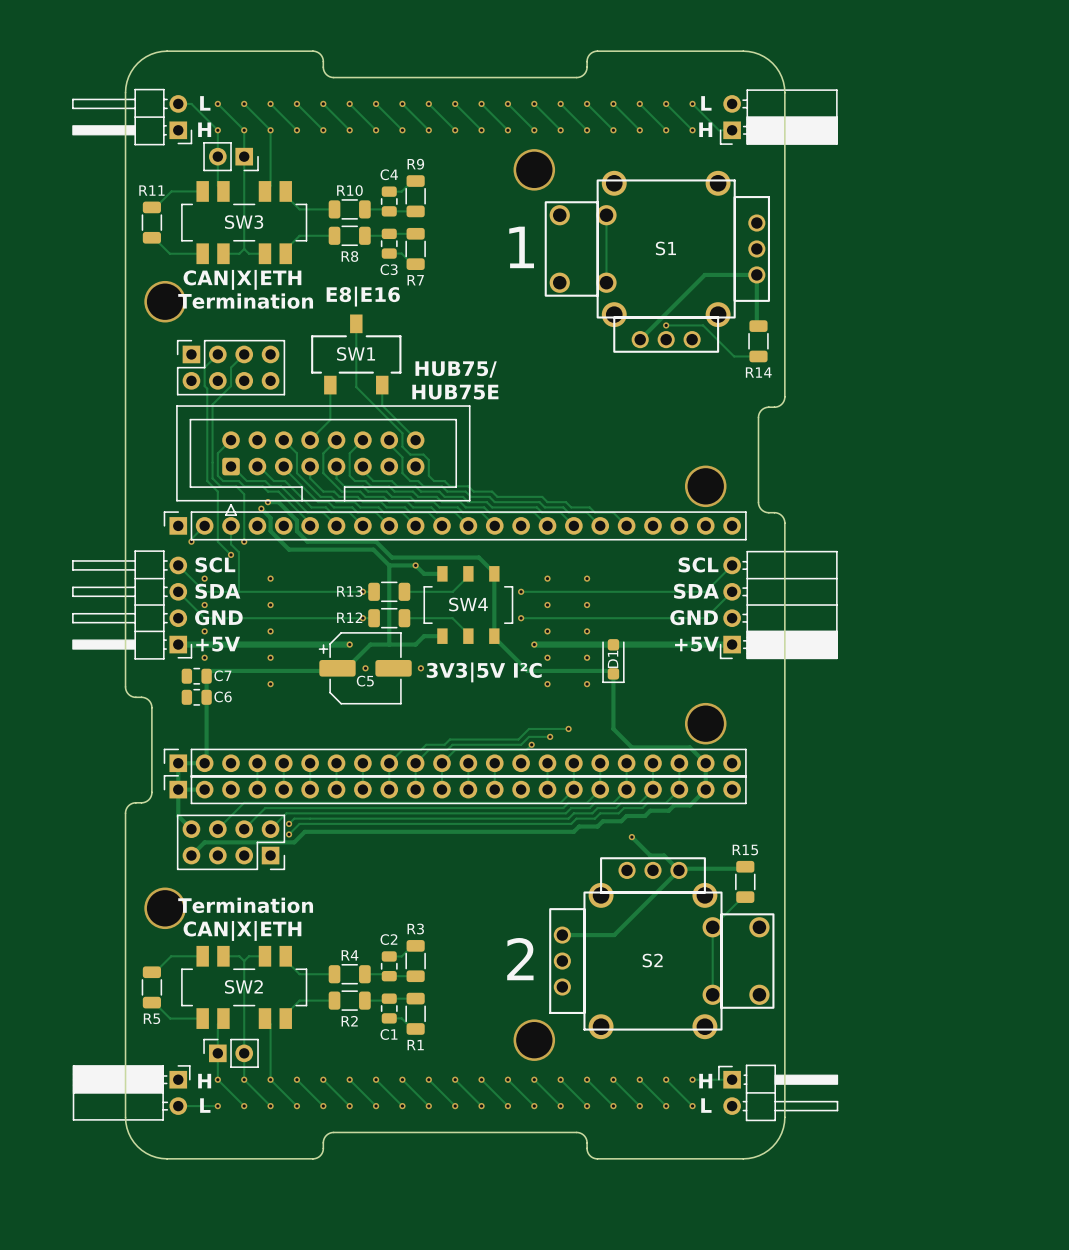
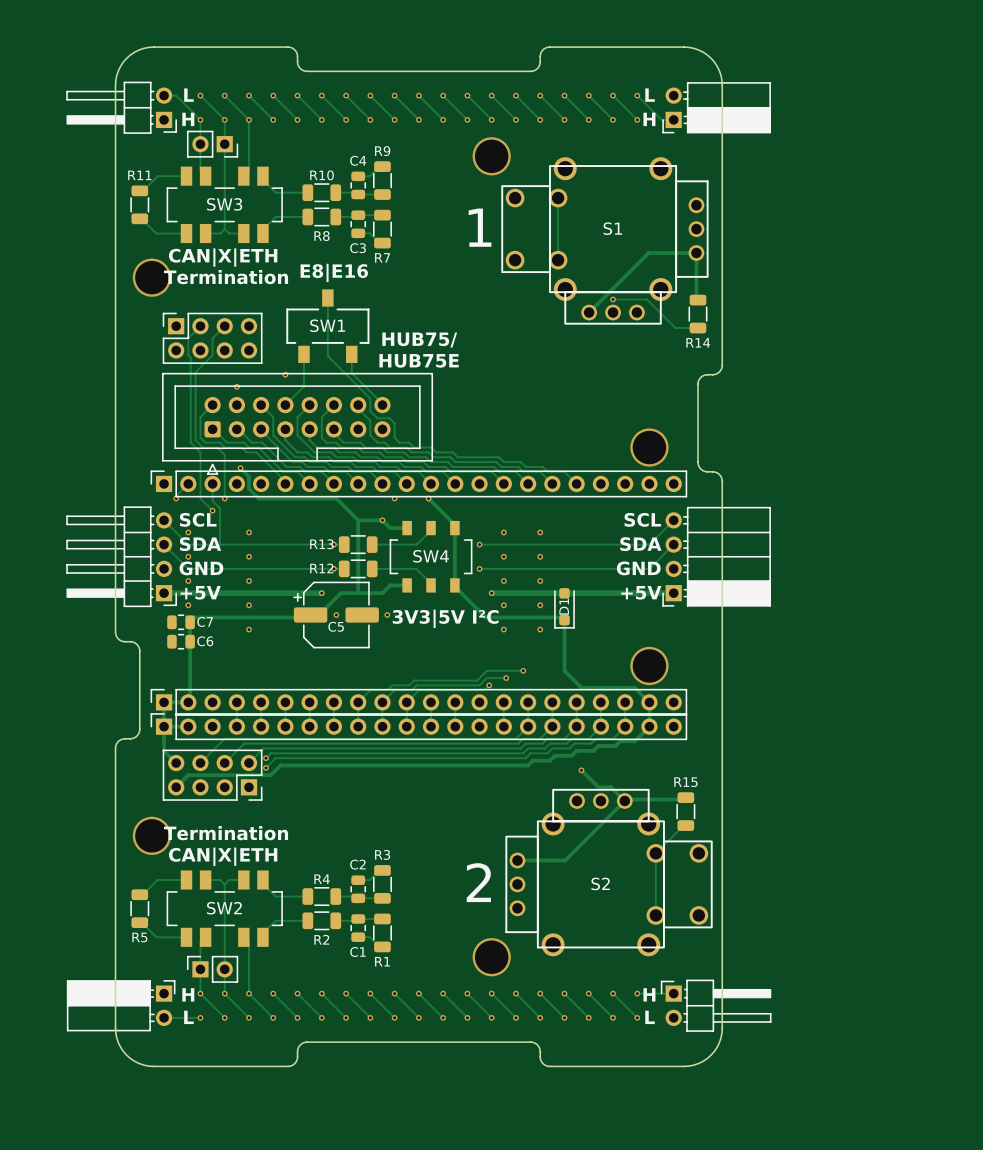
via: none -> (285, 374)
via: none -> (236, 386)
track: (267, 502) (278, 502) (296, 520) (296, 531) (307, 541) -> (258, 498) (282, 498)
via: (267, 502) -> none
track: (281, 541) (289, 549) (373, 549) -> (336, 498) (343, 505)
track: (365, 541) (376, 541) (391, 557) (478, 557) (494, 572) -> (428, 498) (454, 524) (454, 527)
via: none -> (394, 498)
via: none -> (428, 498)

